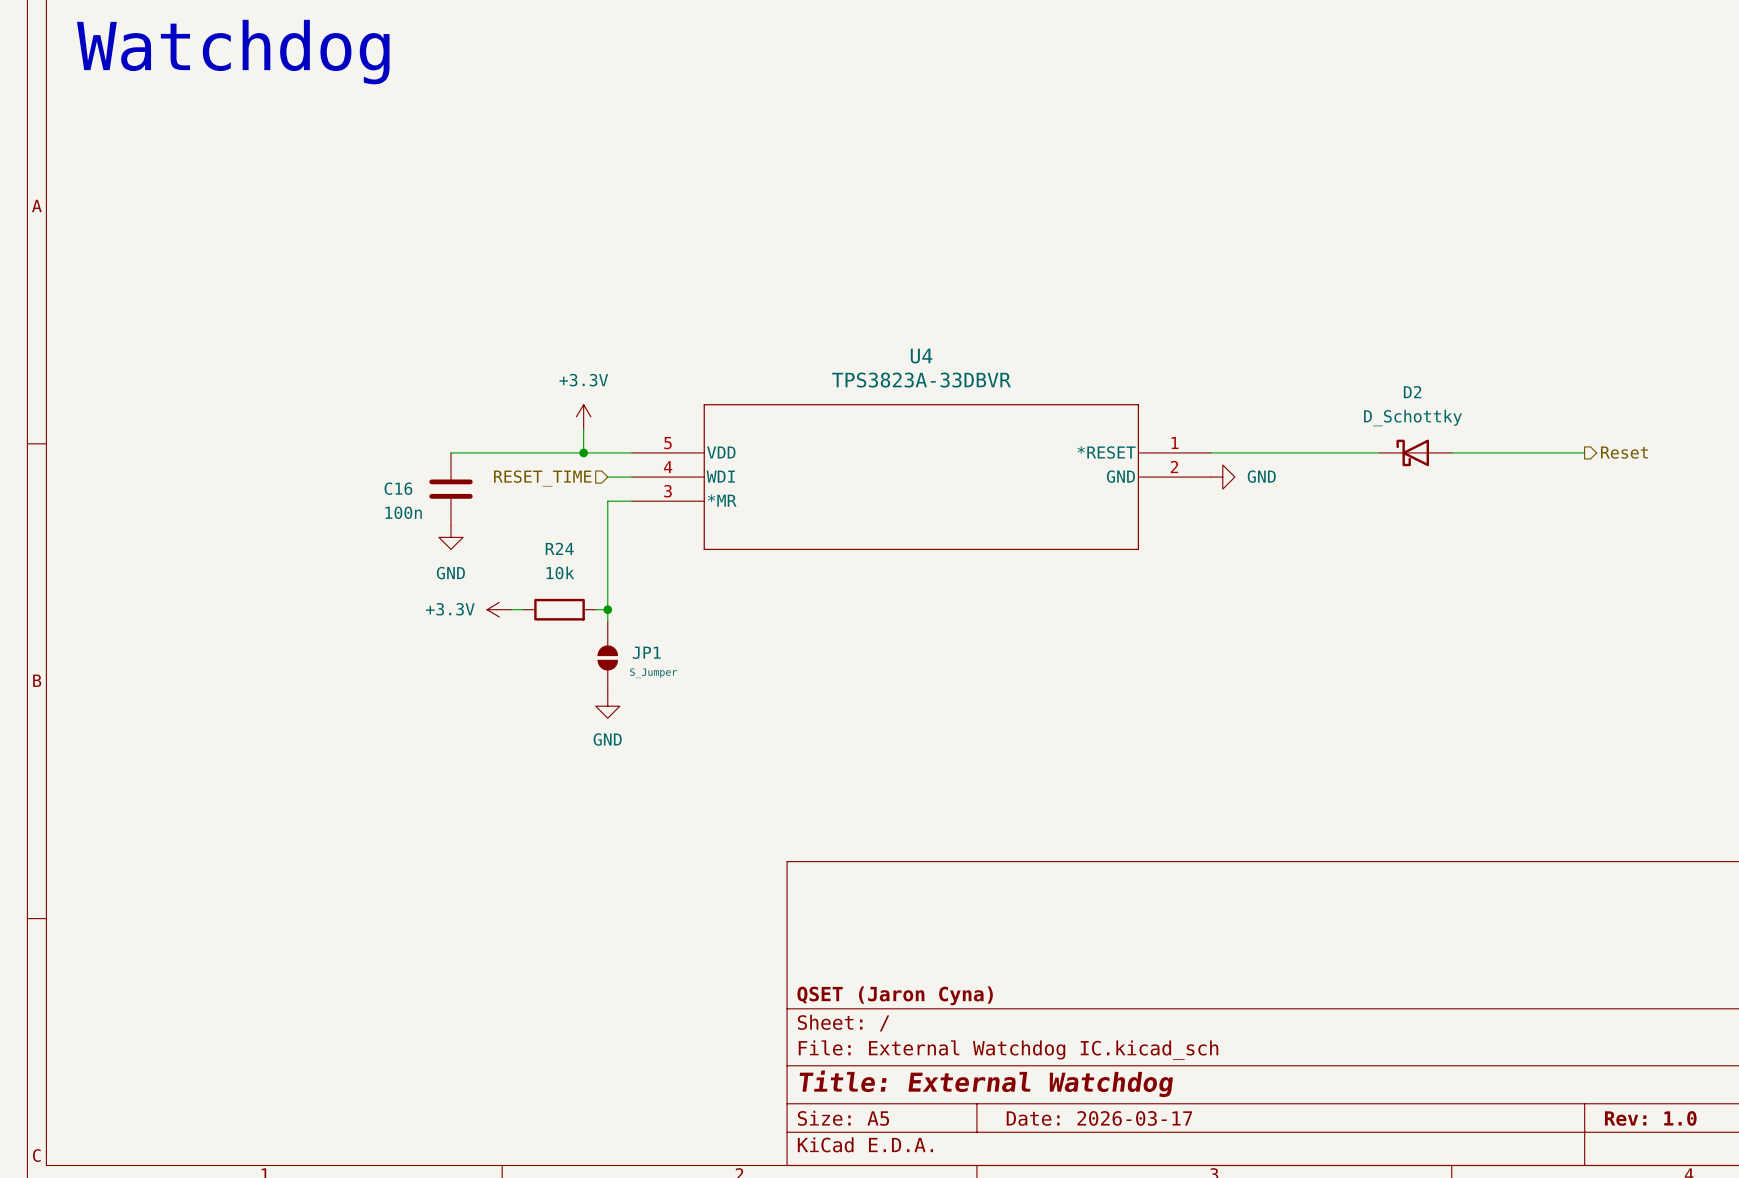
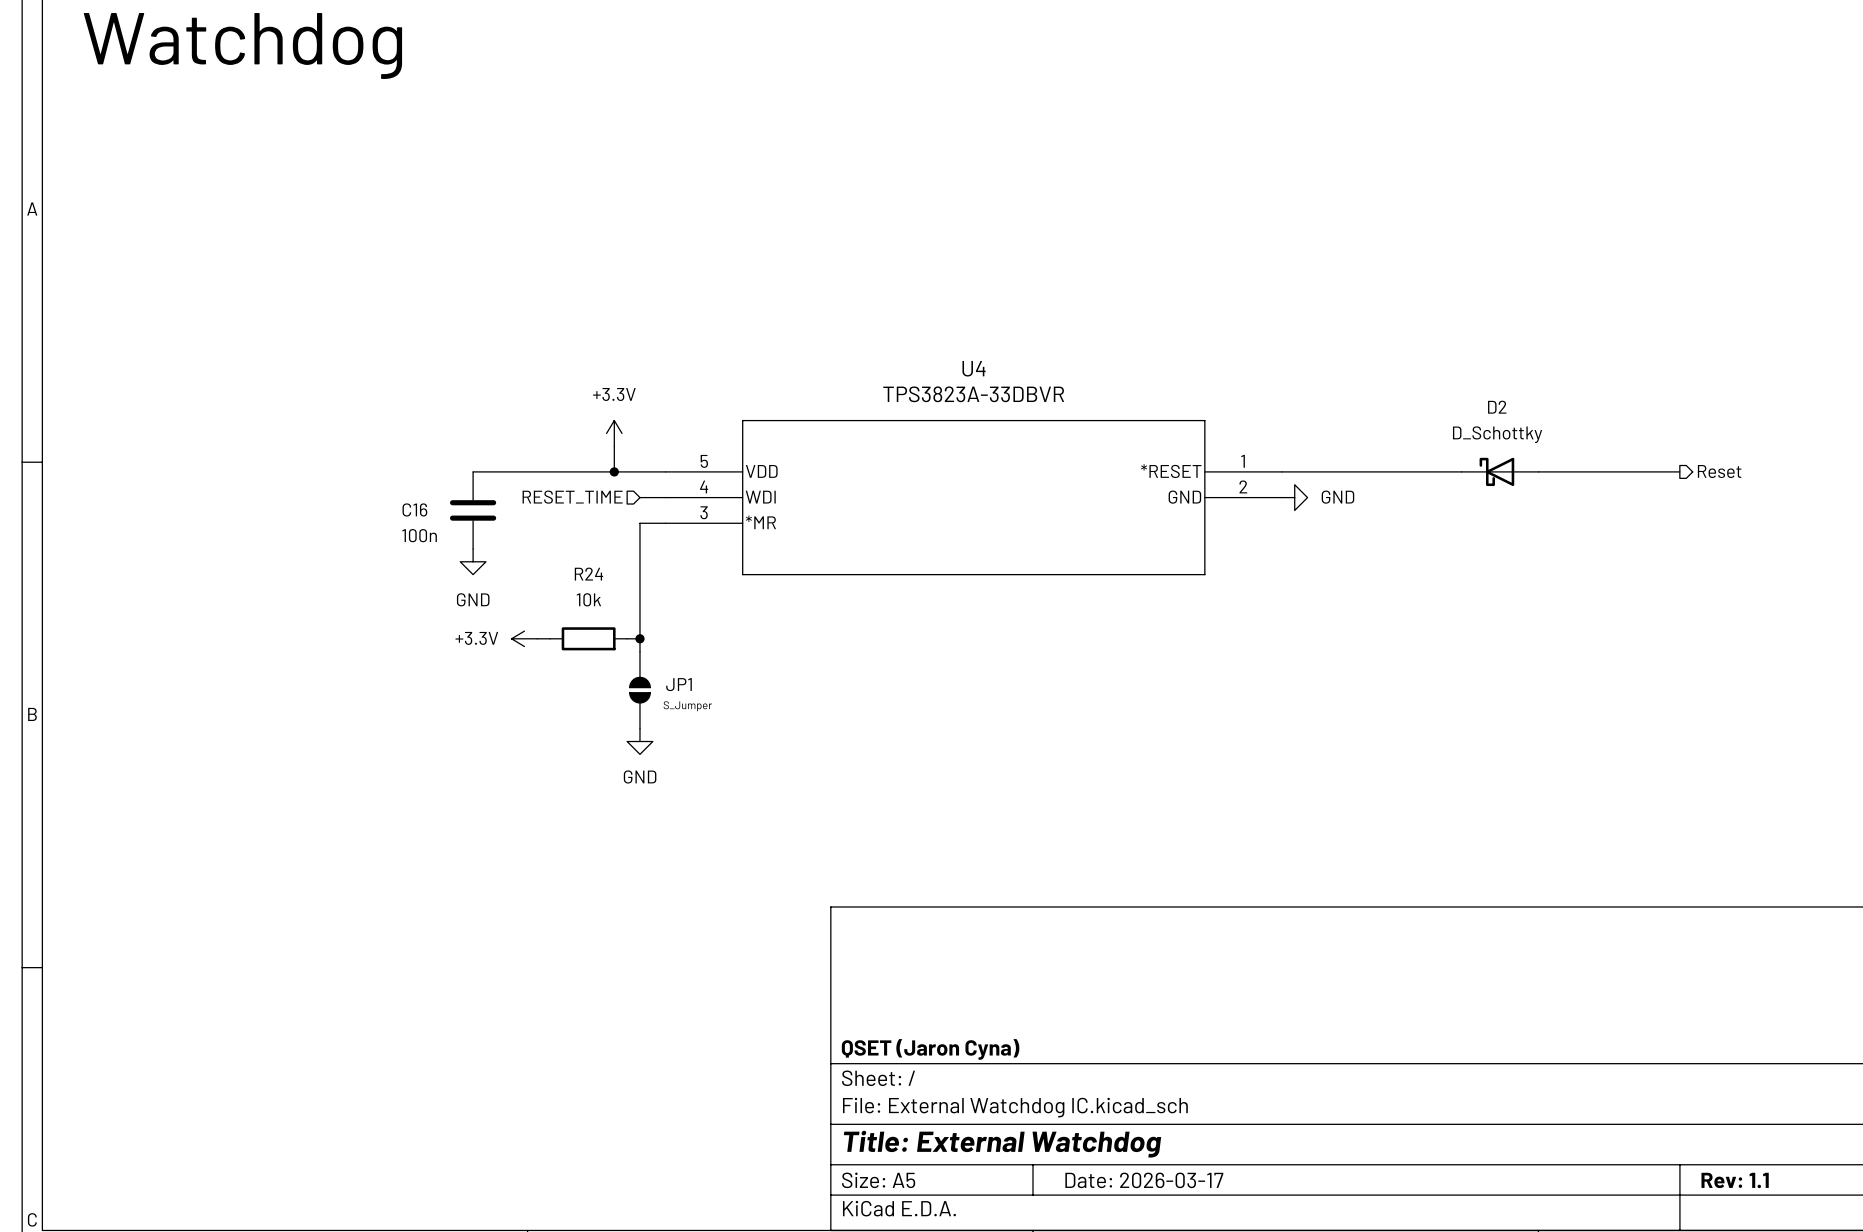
title block: Rev: 1.0 (1650, 1118) -> Rev: 1.1 (1735, 1180)

